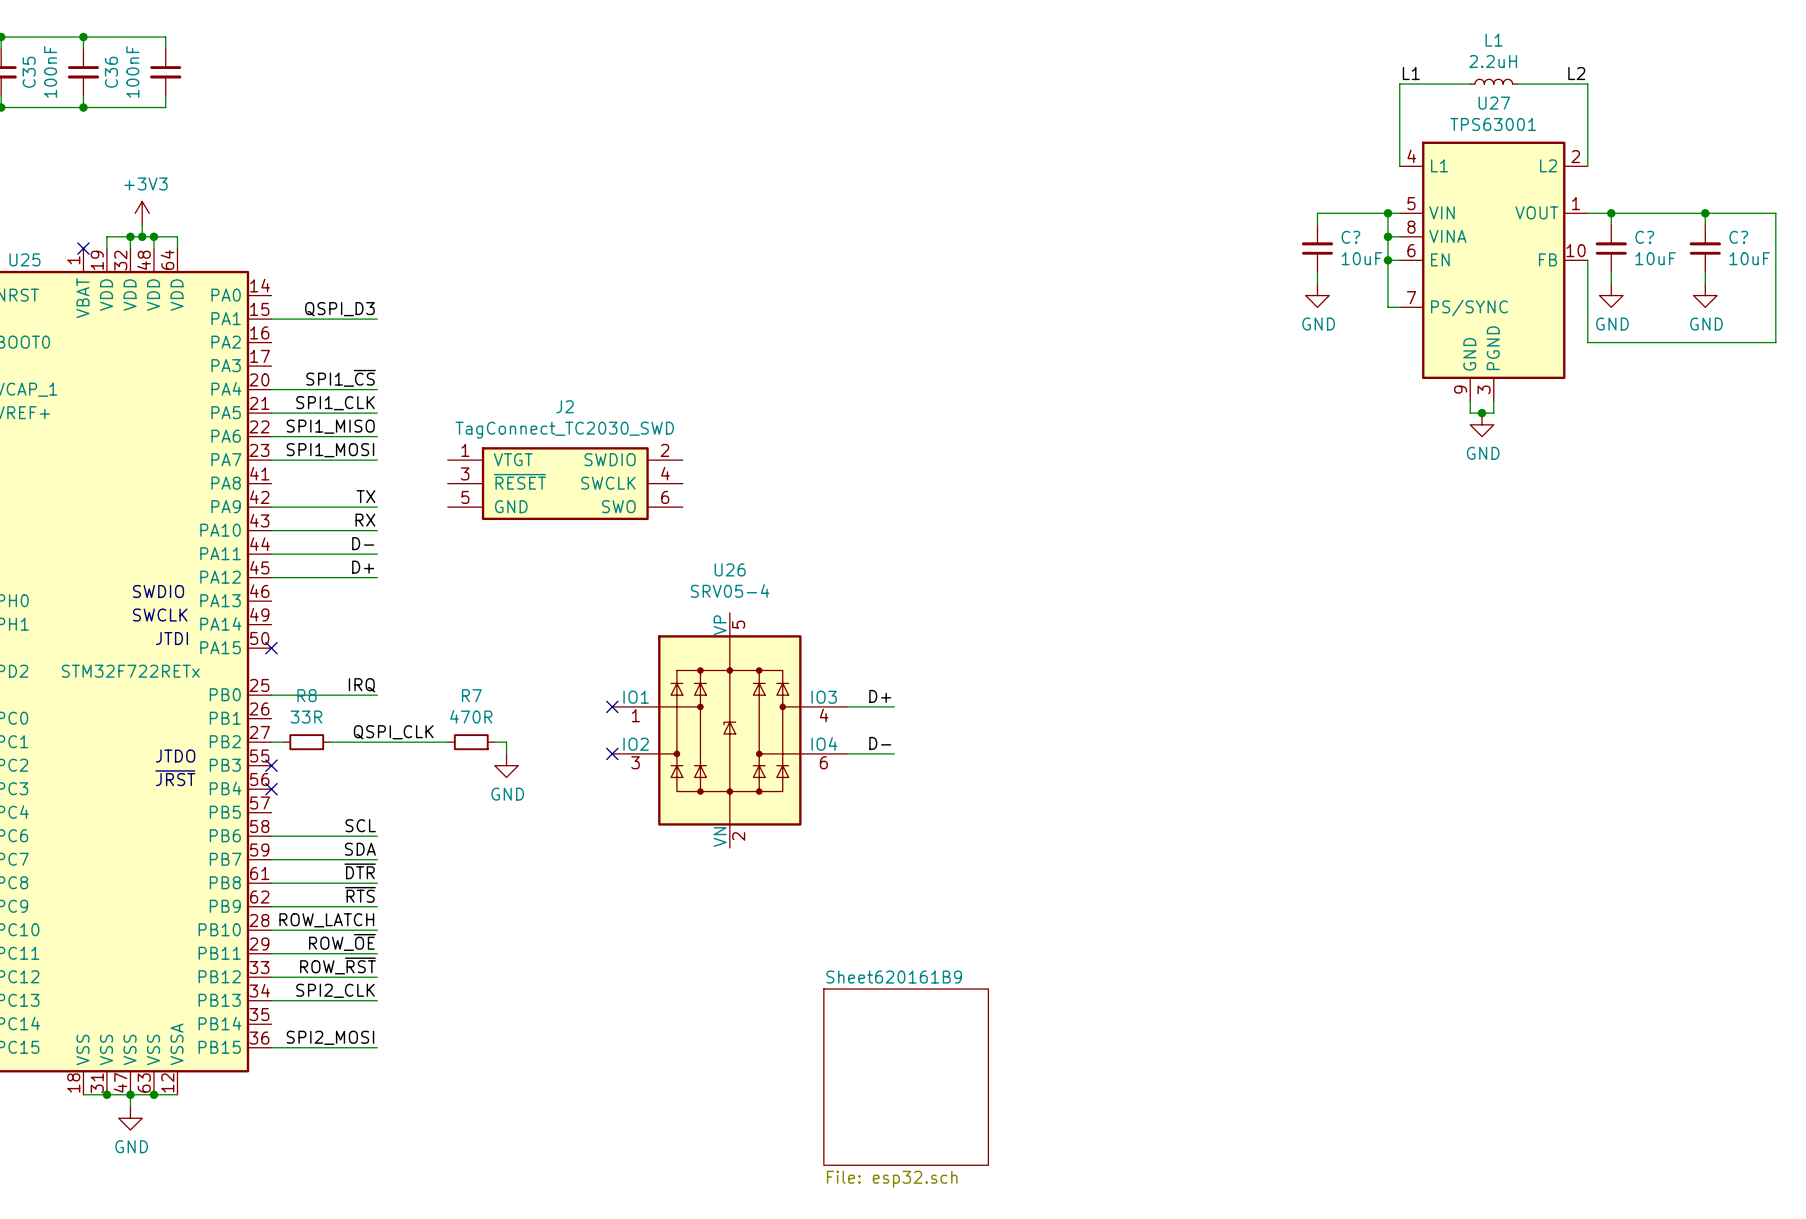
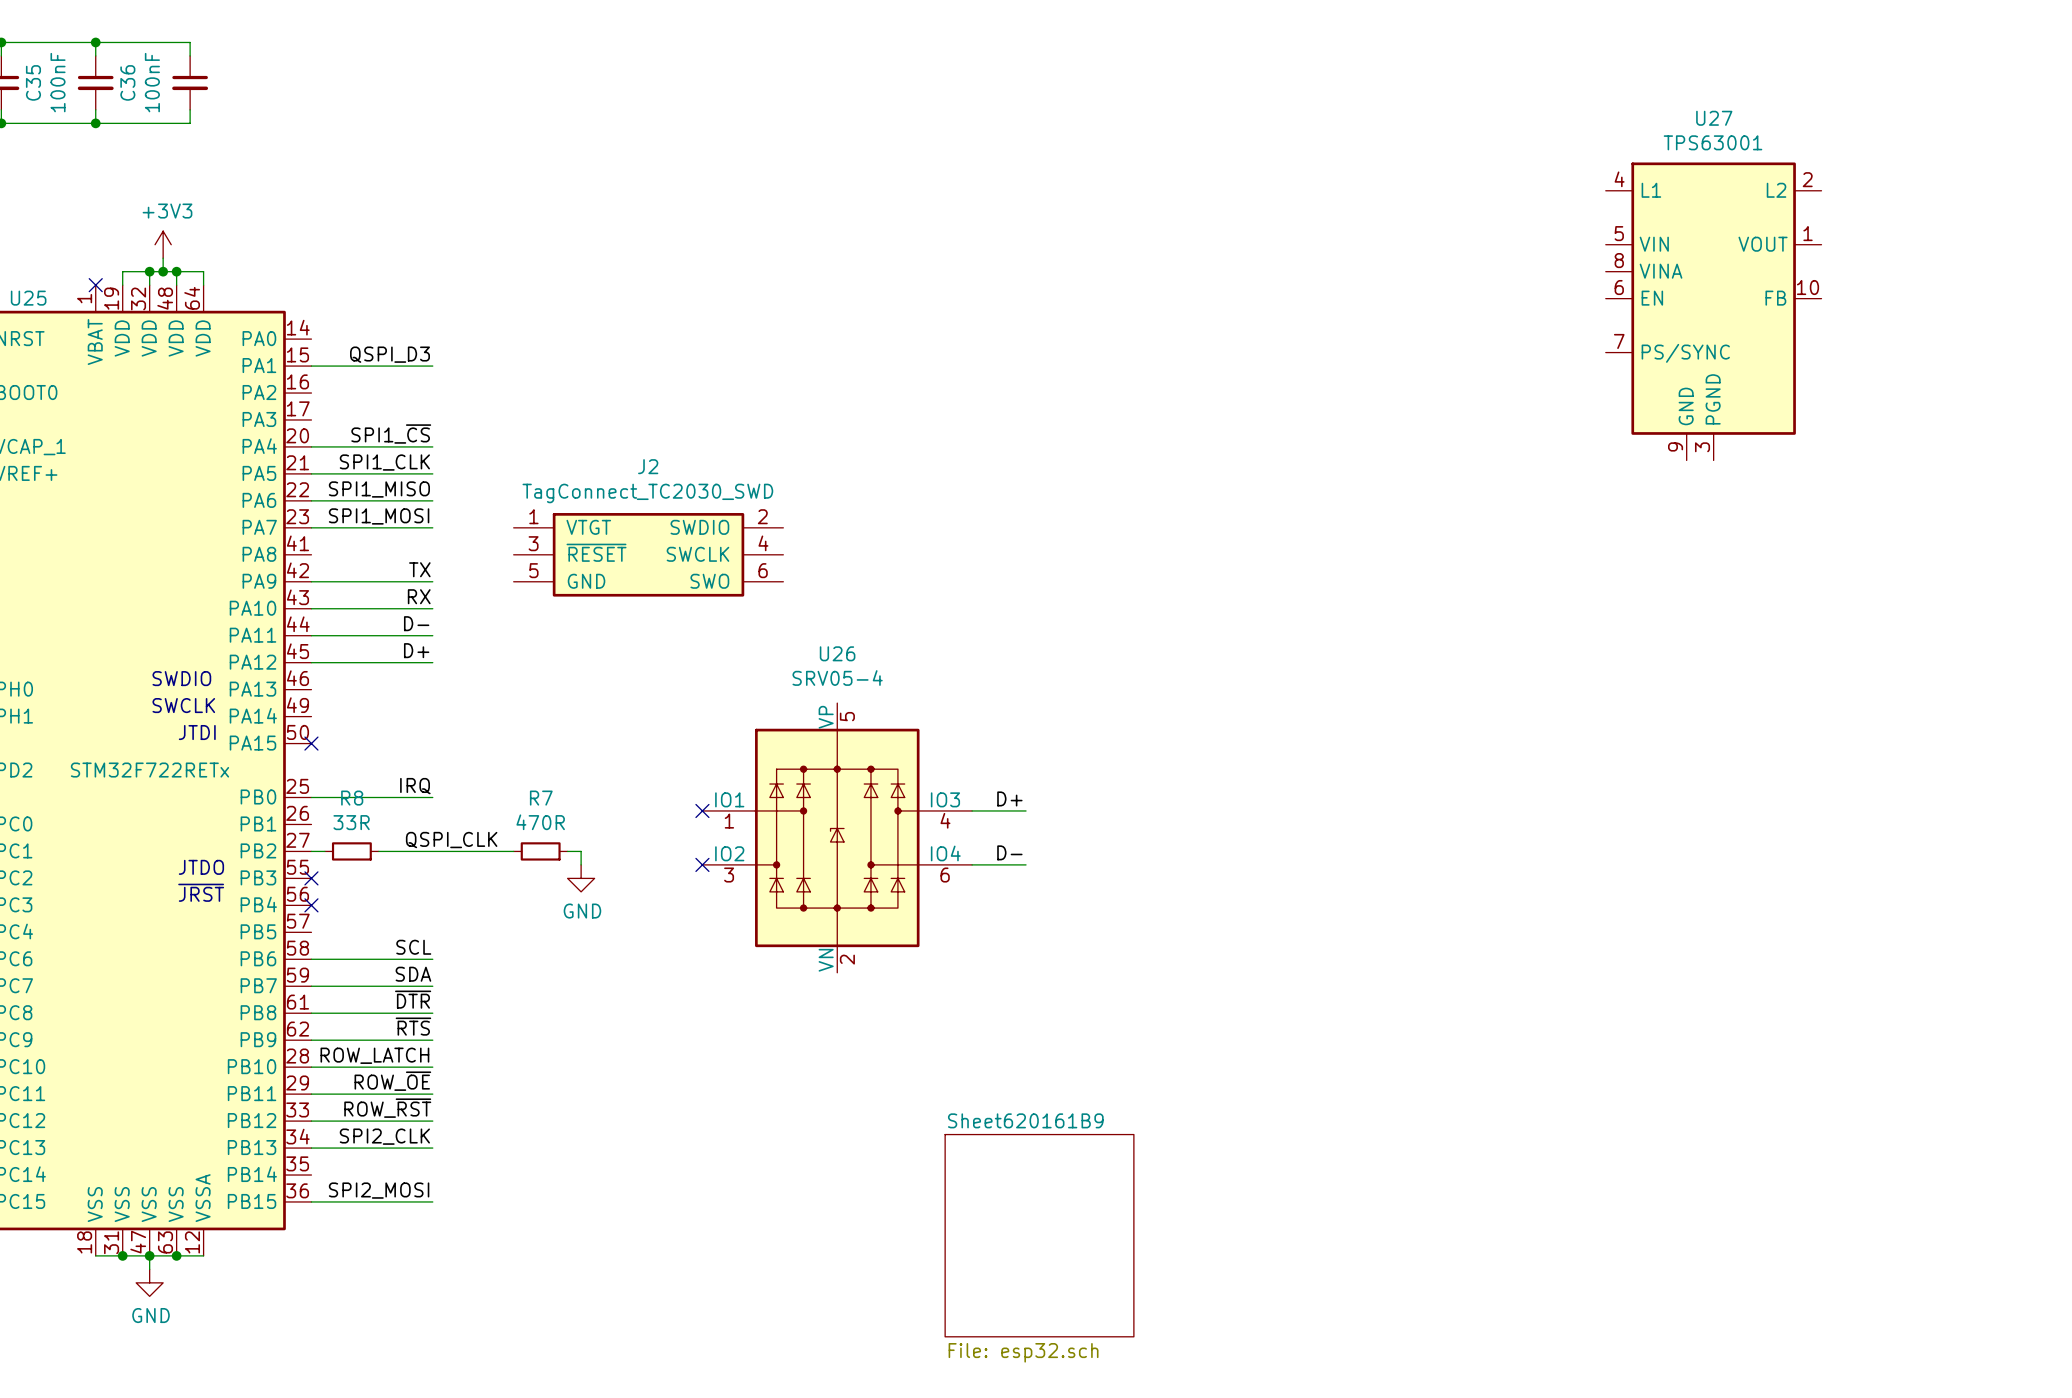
label: L1 (1411, 73) -> none
label: L2 (1576, 73) -> none
L1: 2.2uH (1493, 81) -> none
wire: (1470, 84) (1399, 84) (1399, 166) -> none
wire: (1517, 84) (1587, 84) (1587, 166) -> none
wire: (1387, 213) (1387, 307) (1399, 307) -> none
junction: (1387, 213) -> none
wire: (1399, 213) (1317, 213) (1317, 225) -> none
wire: (1587, 213) (1775, 213) (1775, 342) (1587, 342) (1587, 260) -> none
wire: (1611, 213) (1611, 225) -> none
junction: (1611, 213) -> none
wire: (1705, 213) (1705, 225) -> none
junction: (1705, 213) -> none
wire: (1387, 236) (1399, 236) -> none
junction: (1387, 236) -> none
C?: 10uF (1317, 248) -> none
C?: 10uF (1611, 248) -> none
C?: 10uF (1705, 248) -> none
wire: (1387, 260) (1399, 260) -> none
junction: (1387, 260) -> none
wire: (1317, 272) (1317, 283) -> none
wire: (1611, 272) (1611, 283) -> none
wire: (1705, 272) (1705, 283) -> none
power symbol: GND (1317, 295) -> none
power symbol: GND (1611, 295) -> none
power symbol: GND (1705, 295) -> none
wire: (1470, 401) (1470, 413) (1493, 413) (1493, 401) -> none
junction: (1482, 413) -> none
power symbol: GND (1482, 424) -> none

